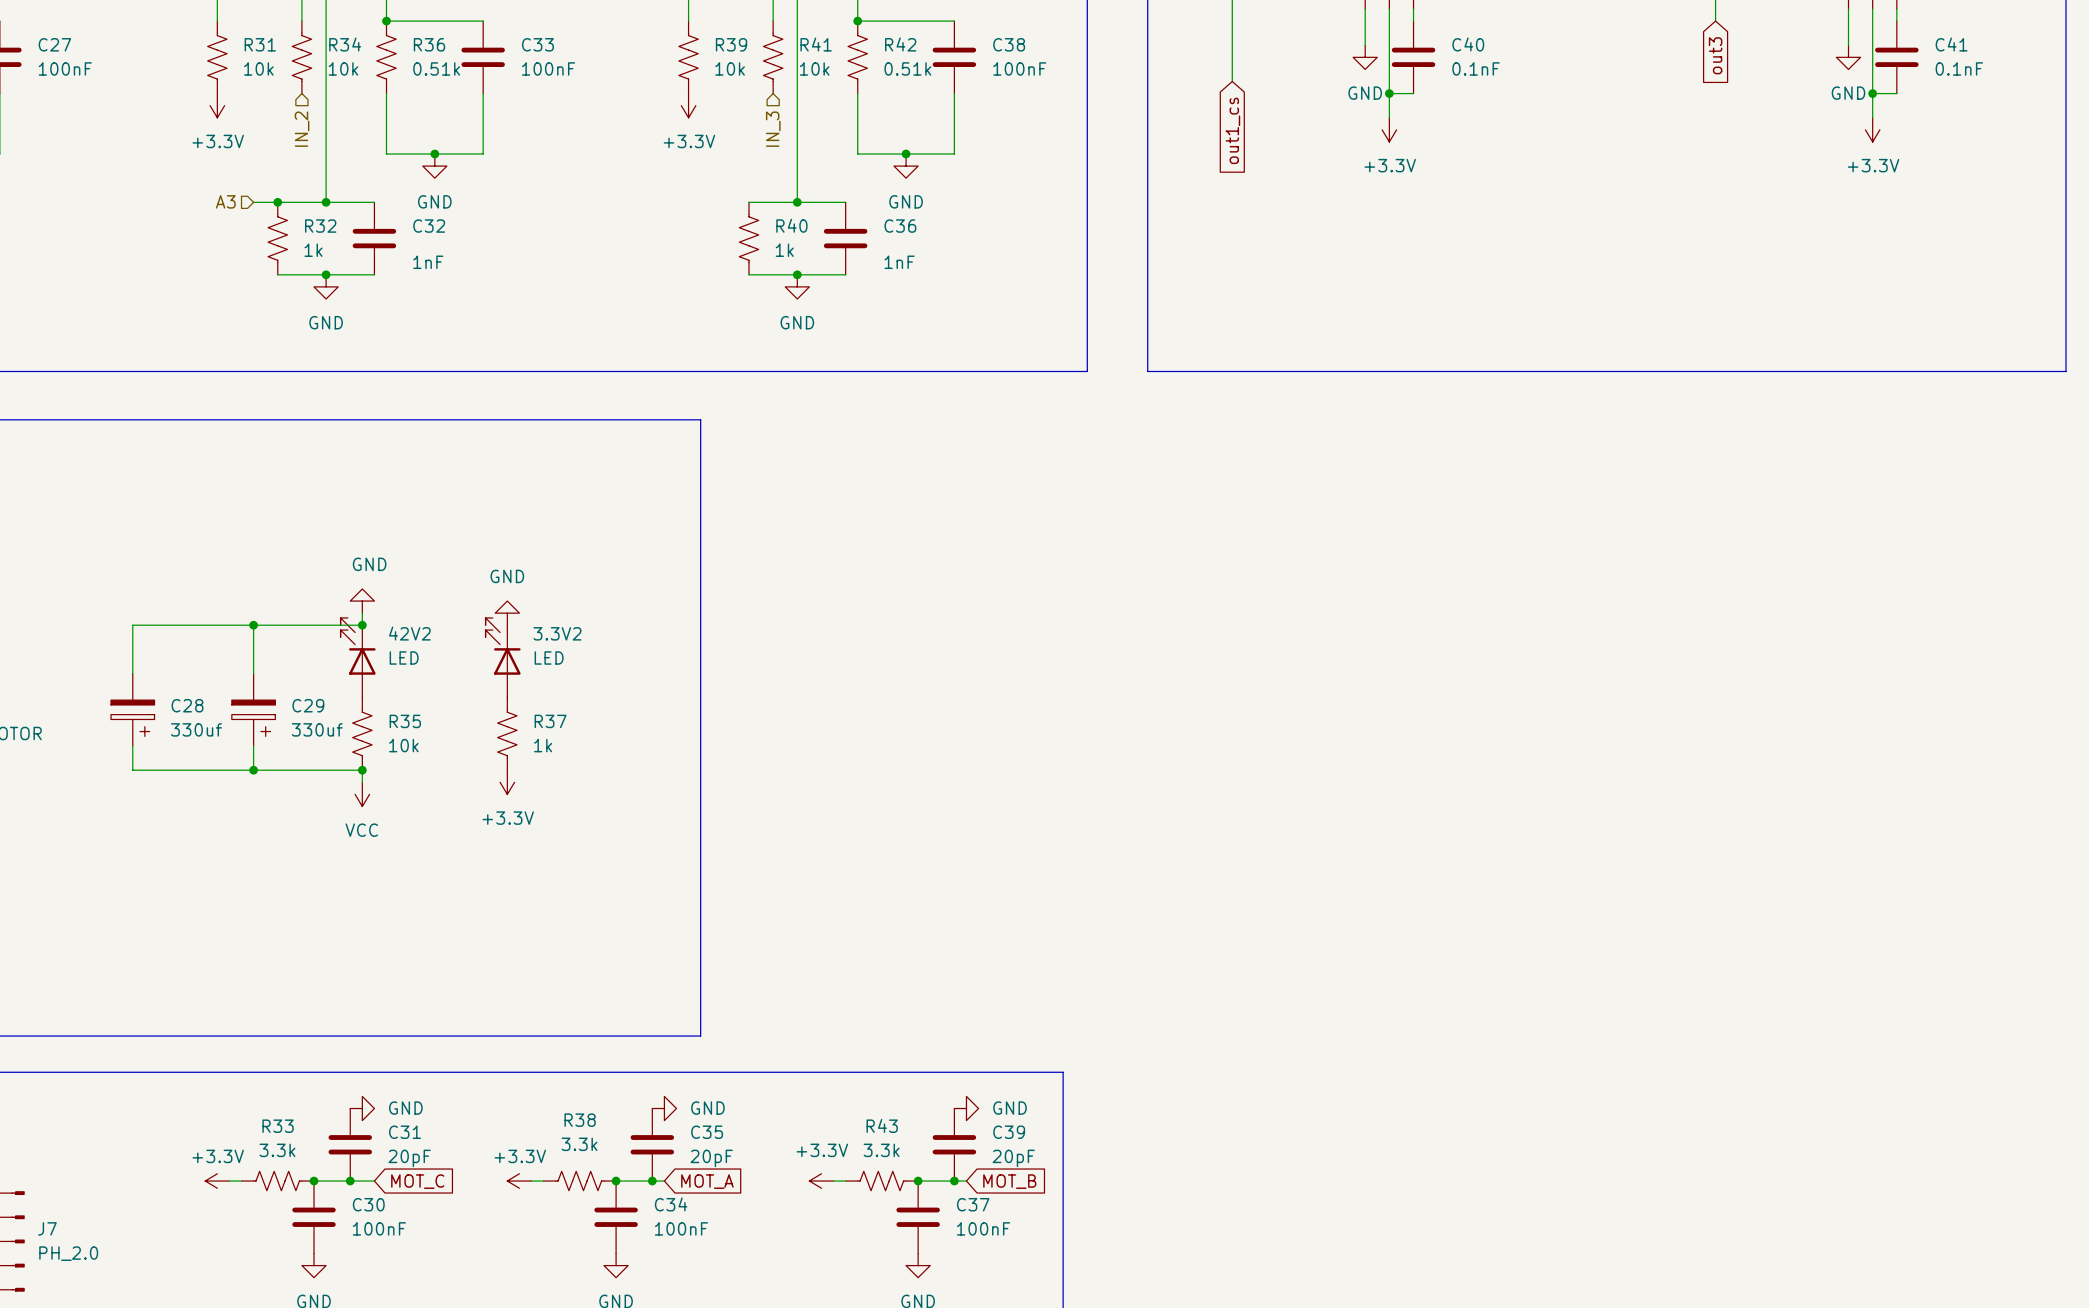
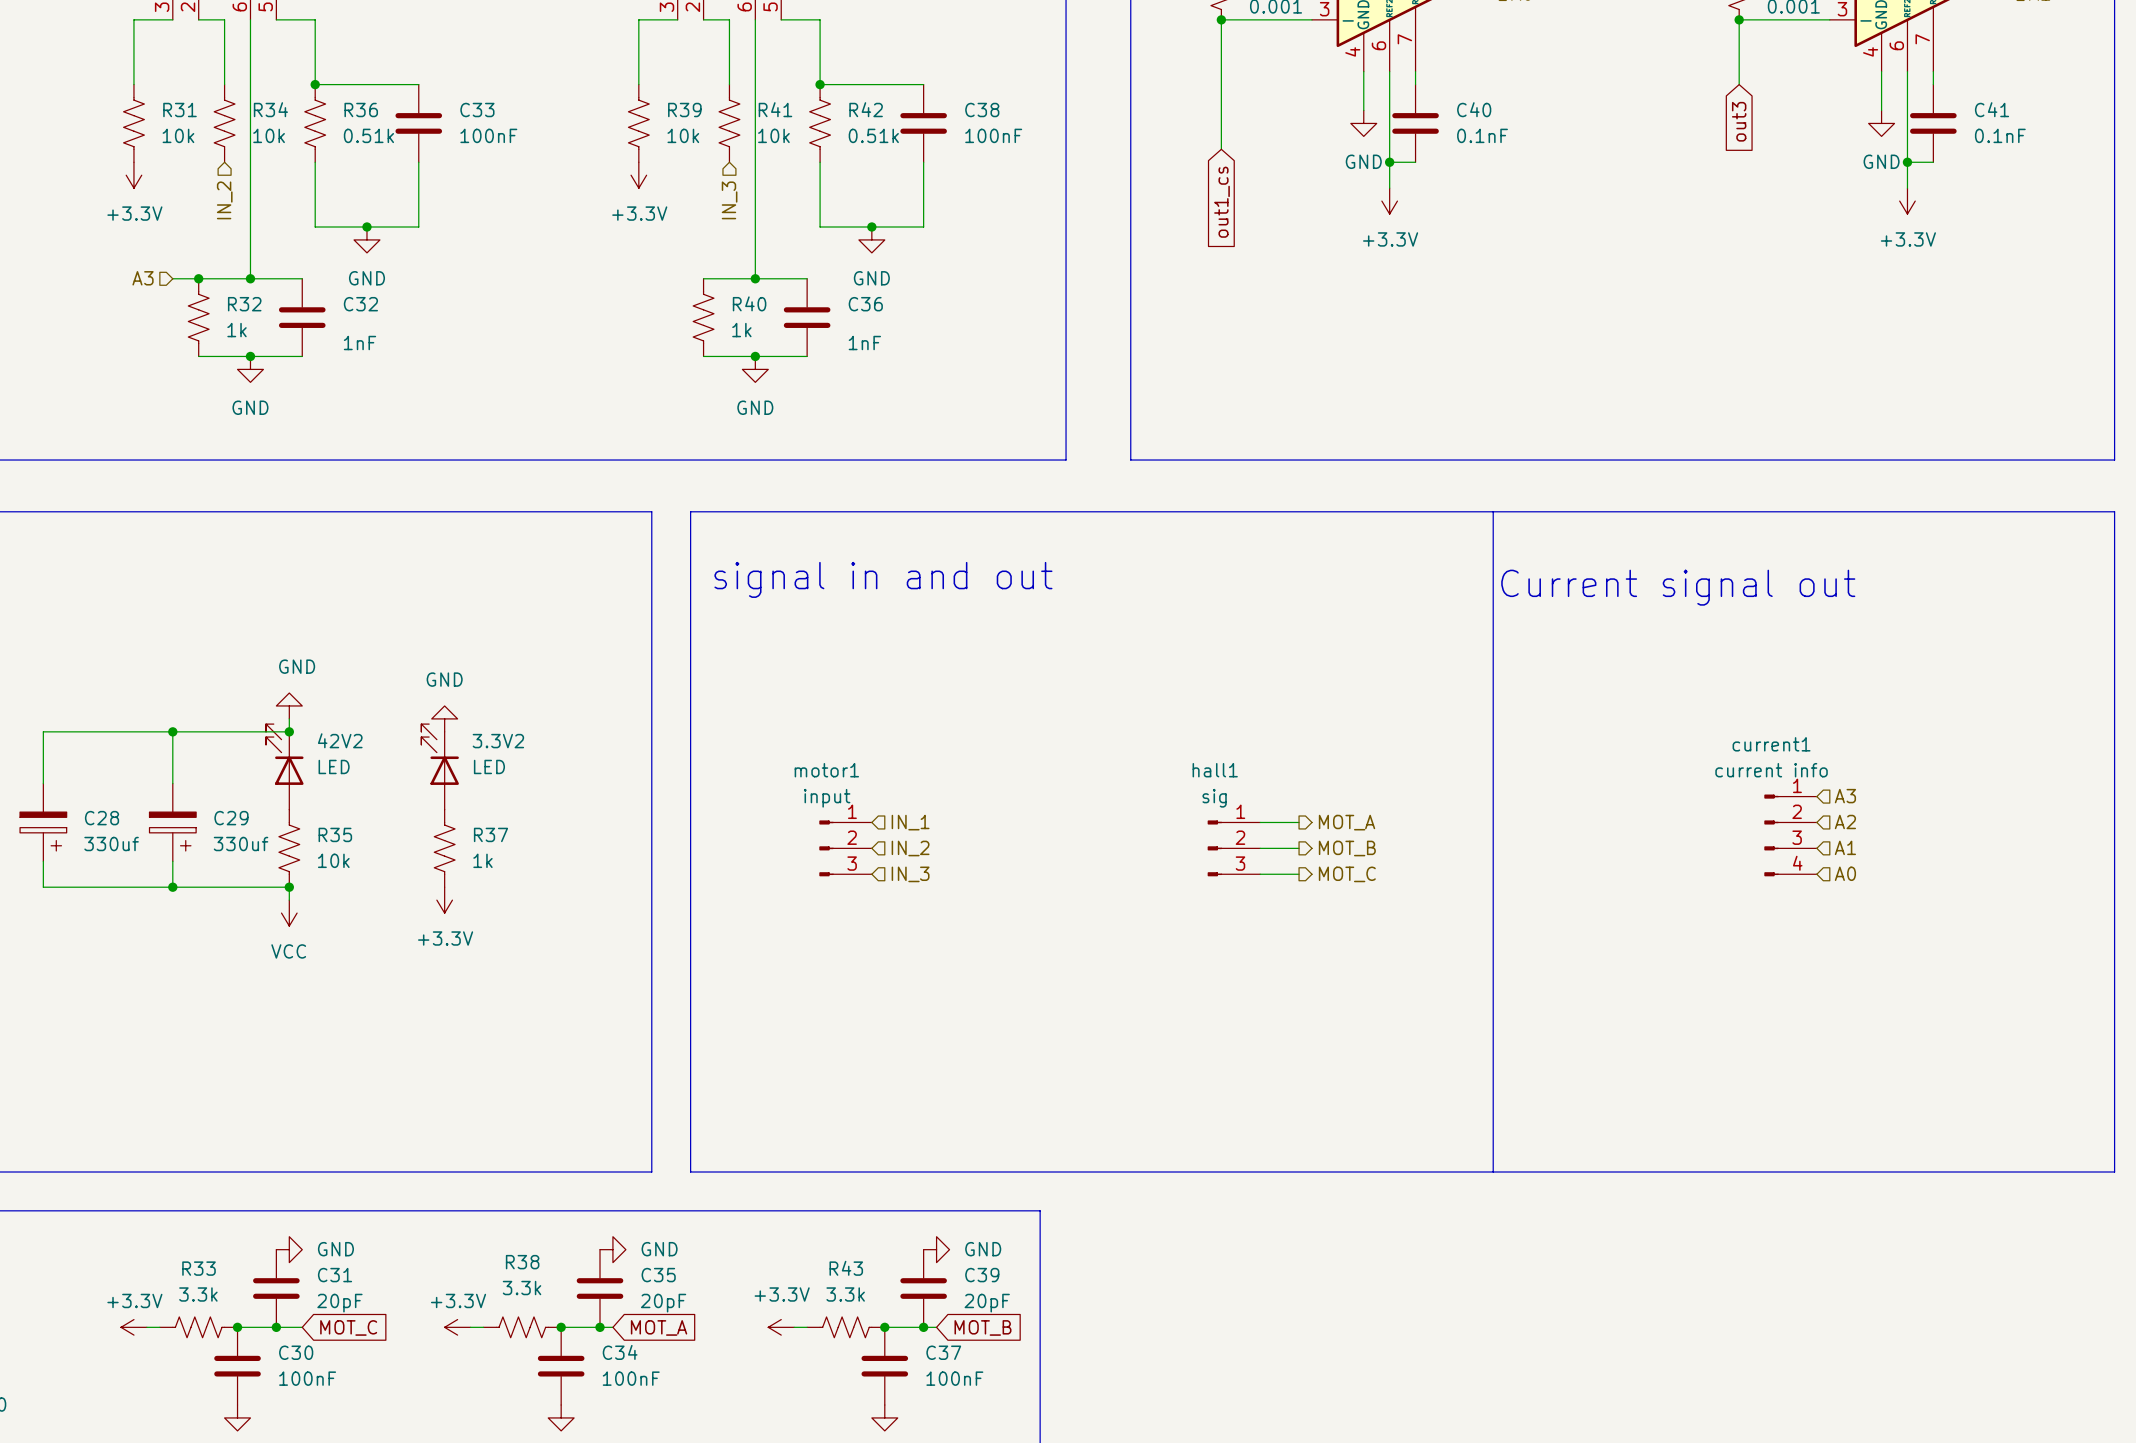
line: none -> (690, 511) (690, 1172) (2114, 1172) (2114, 511) (690, 511)
line: none -> (1493, 511) (1493, 1172)
text: none -> signal in and out (883, 579)
text: none -> Current signal out (1678, 587)
hierarchical label: none -> A3 (1845, 796)
hierarchical label: none -> IN_1 (910, 822)
wire: none -> (1260, 822) (1299, 822)
hierarchical label: none -> MOT_A (1347, 822)
hierarchical label: none -> A2 (1845, 821)
current1: none -> current info (1790, 835)
motor1: none -> input (845, 848)
hall1: none -> sig (1233, 848)
wire: none -> (1260, 848) (1299, 848)
hierarchical label: none -> A1 (1845, 847)
hierarchical label: none -> IN_2 (910, 848)
hierarchical label: none -> MOT_B (1347, 848)
hierarchical label: none -> A0 (1845, 873)
hierarchical label: none -> IN_3 (910, 874)
wire: none -> (1260, 874) (1299, 874)
hierarchical label: none -> MOT_C (1347, 874)

